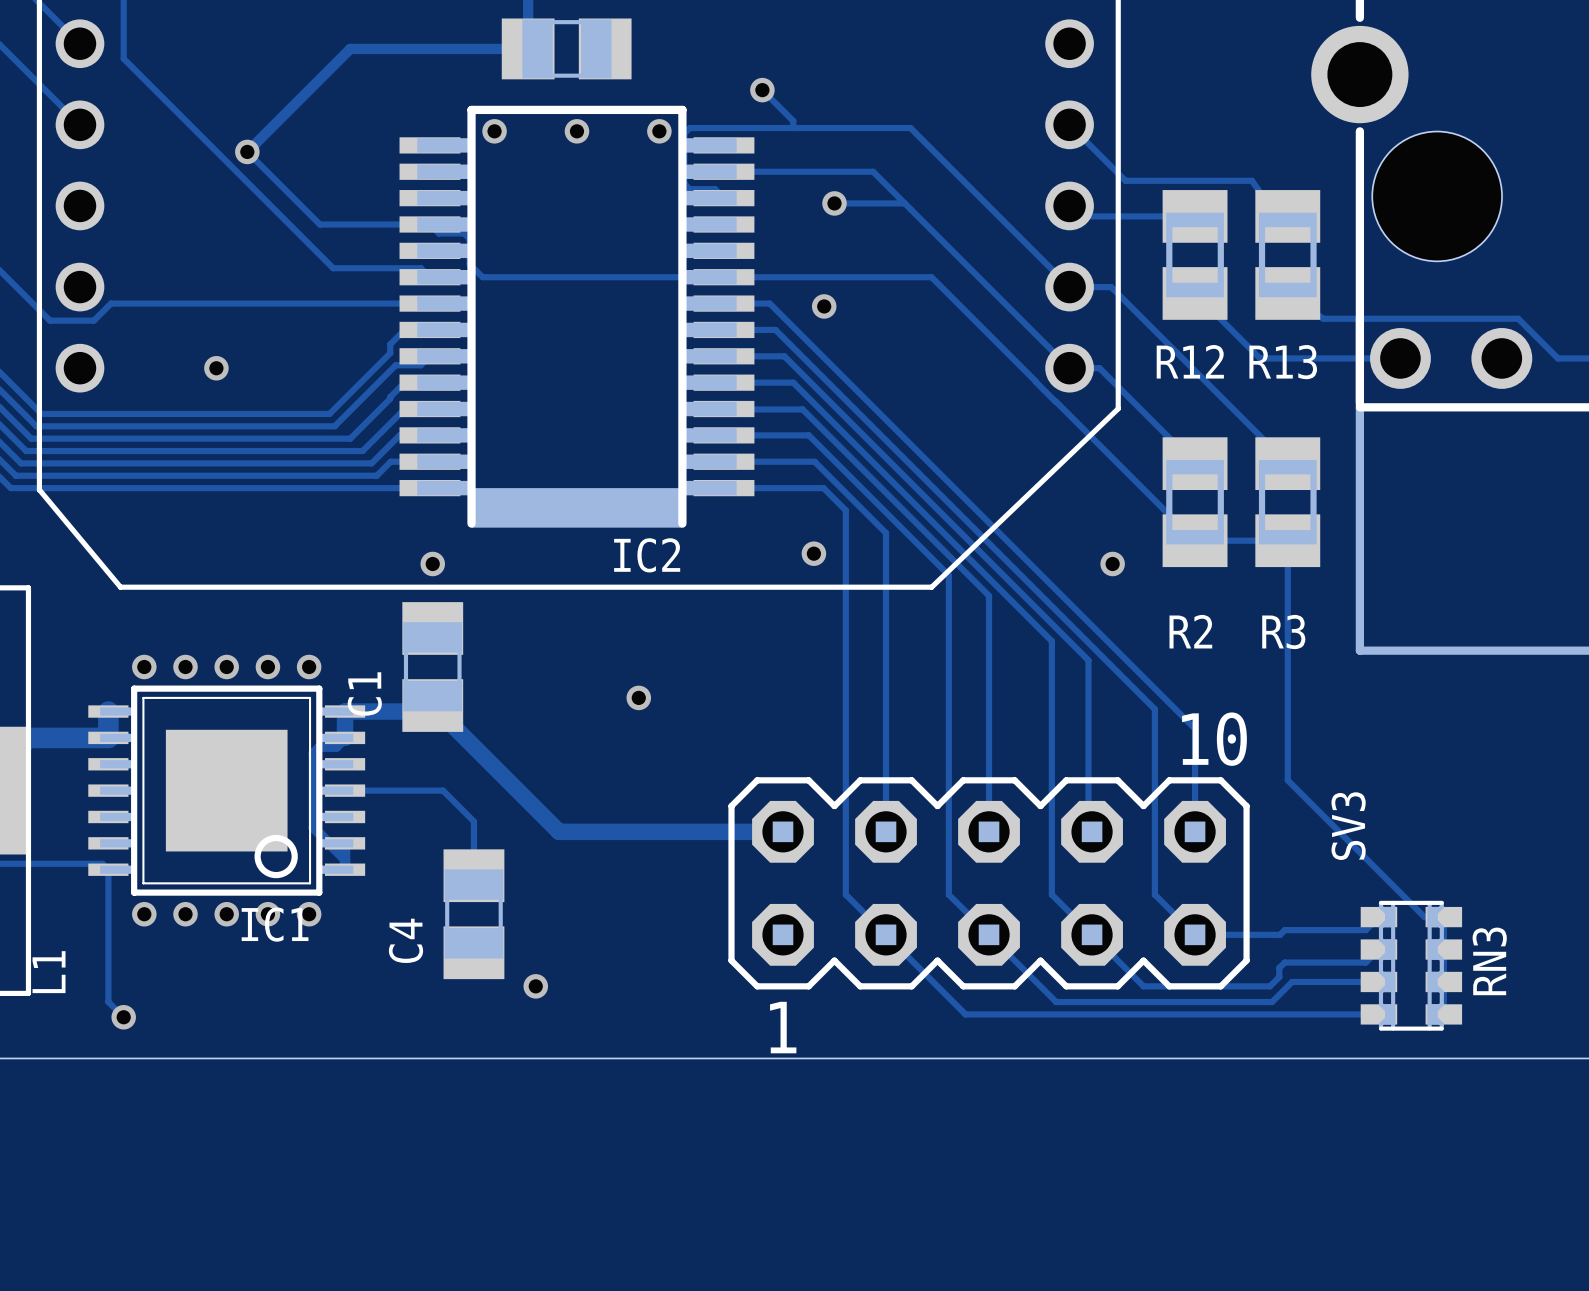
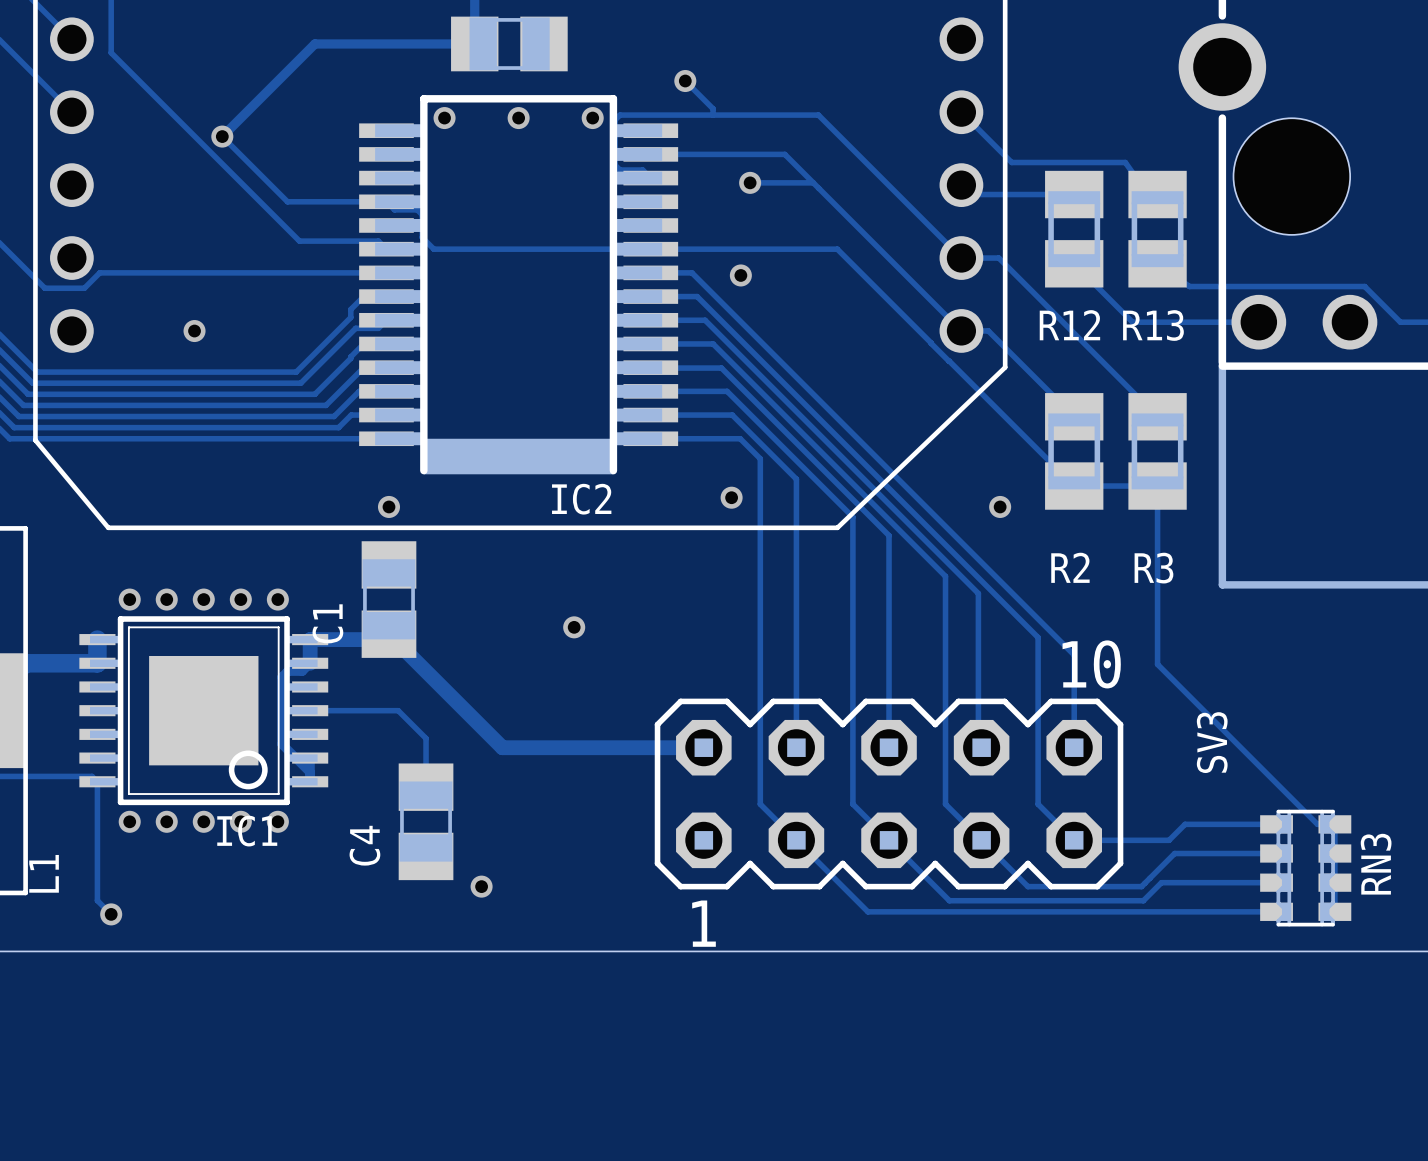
track: (1287, 739) (1287, 780) (1424, 917) (1443, 917) (1443, 1014) -> (1157, 664) (1317, 824) (1334, 824) (1334, 911)
track: (1378, 917) (1365, 930) (1284, 930) (1280, 934) -> (1276, 824) (1185, 824) (1169, 840) (1150, 840)
track: (1378, 949) (1365, 962) (1284, 962) (1279, 967) (1279, 977) -> (1276, 853) (1174, 853) (1149, 878)
RN3 position: (1411, 965) -> (1305, 868)
track: none -> (1239, 882) (1276, 882)
track: none -> (1239, 911) (1276, 911)

